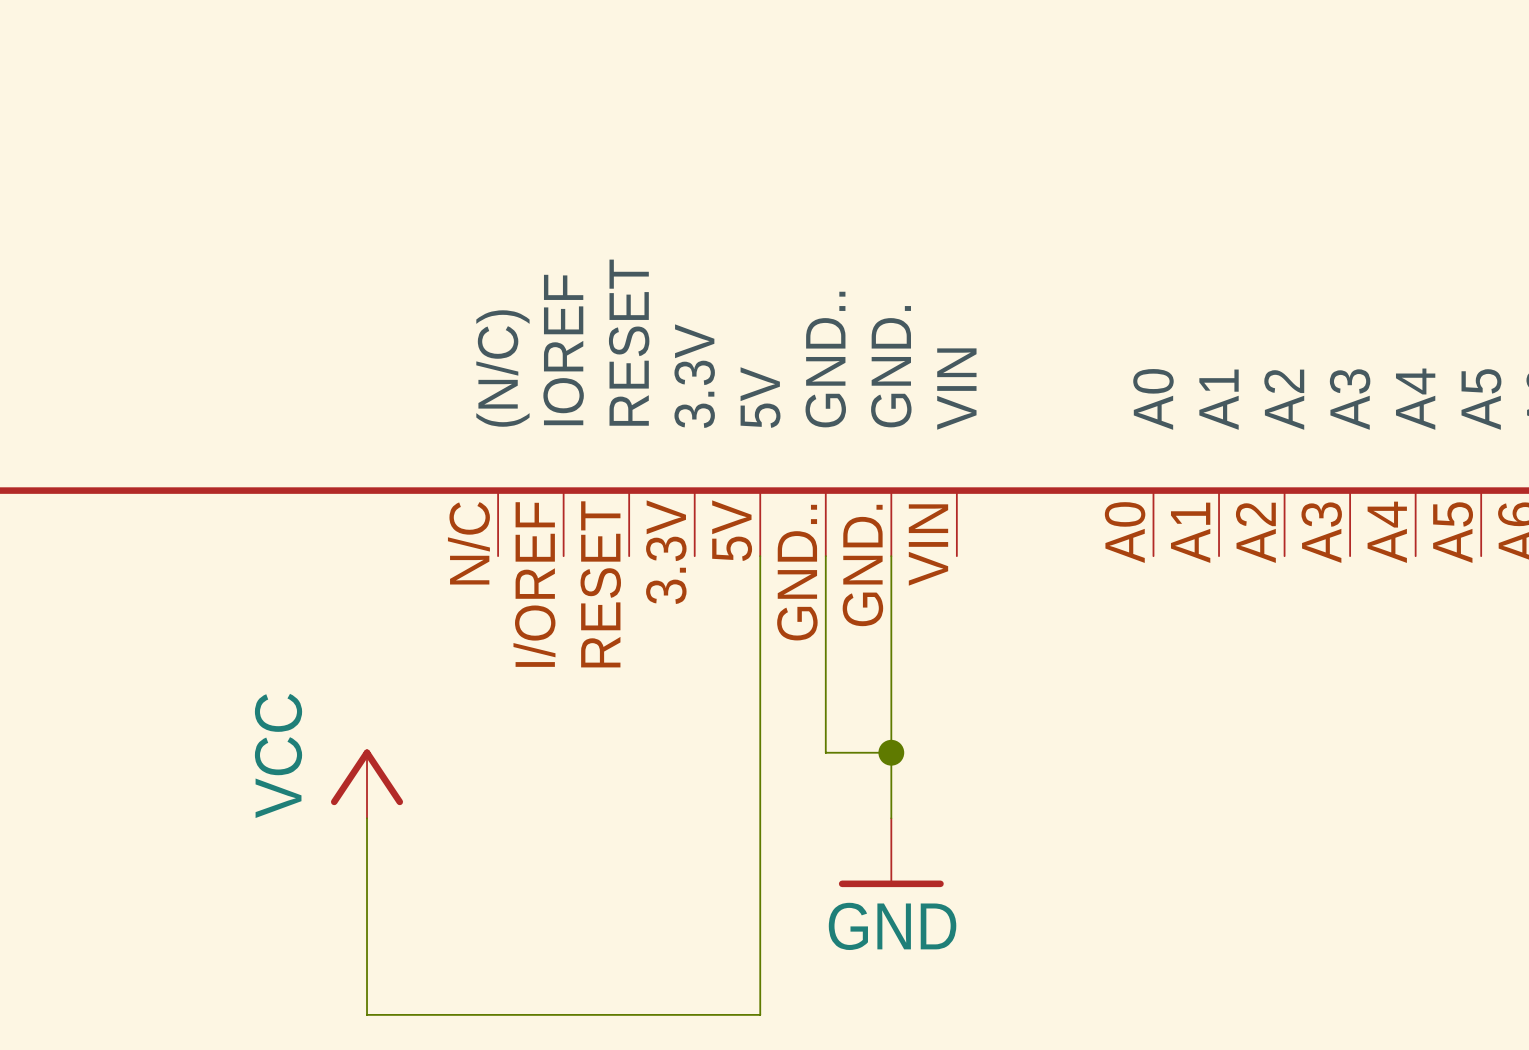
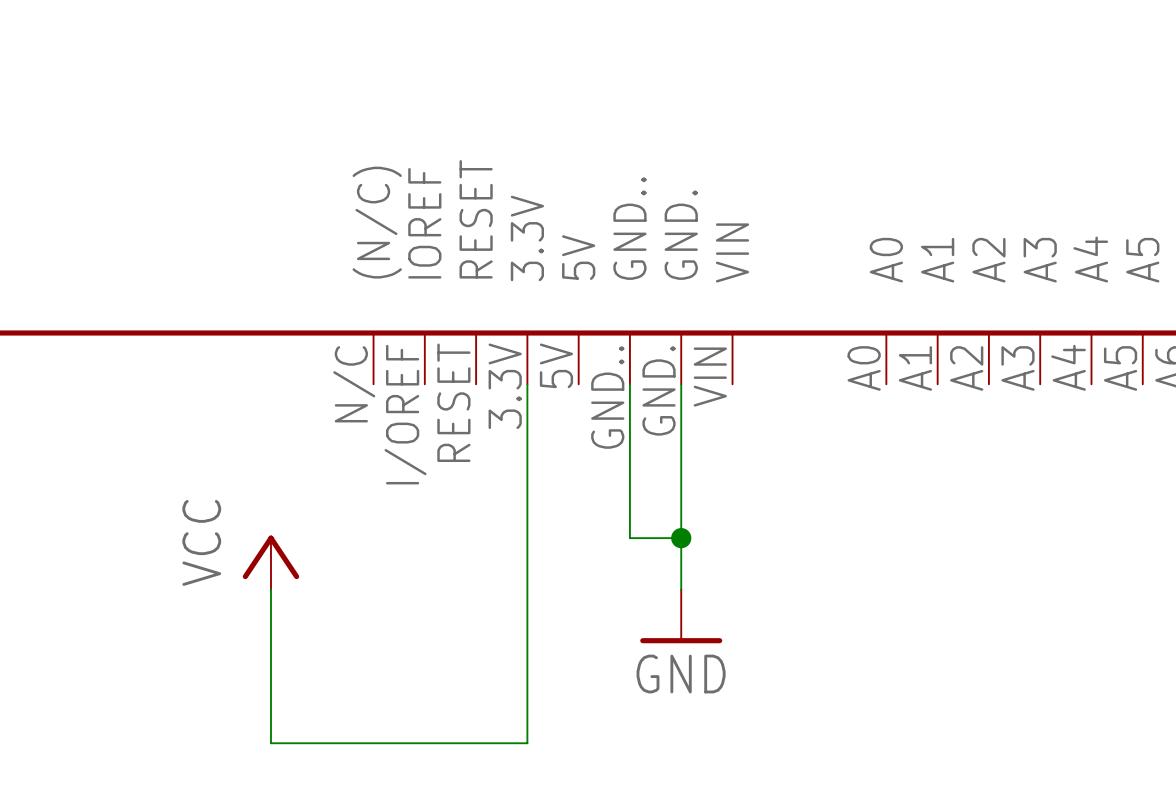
wire: (760, 556) (760, 1014) (694, 1014) -> (527, 384) (527, 743)

